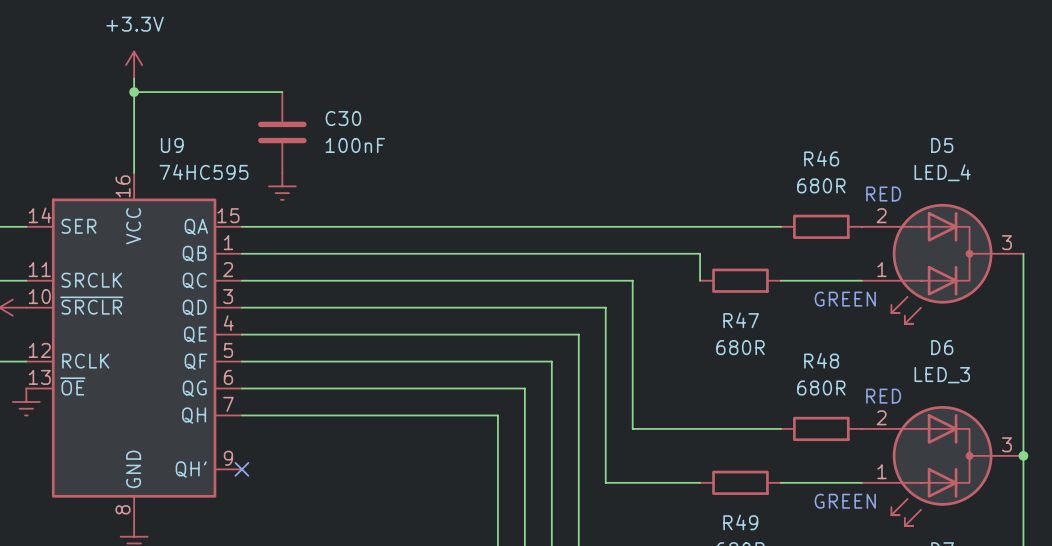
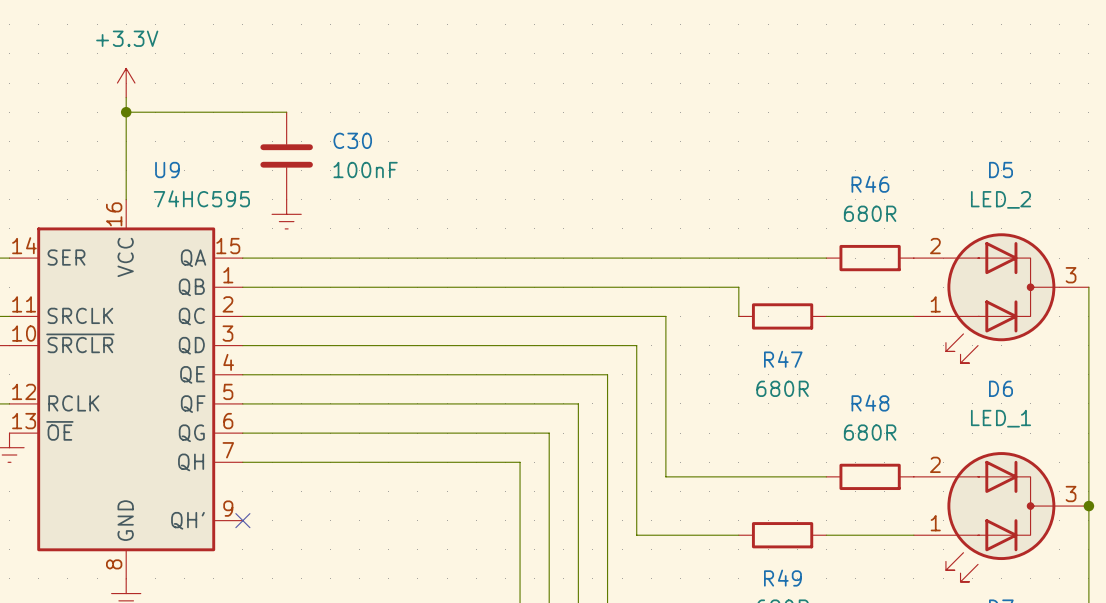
D5 value: LED_4 (942, 172) -> LED_2 (1001, 199)
text: RED (883, 194) -> none
text: GREEN (845, 299) -> none
D6 value: LED_3 (942, 375) -> LED_1 (1001, 418)
text: RED (883, 396) -> none
text: GREEN (845, 501) -> none

